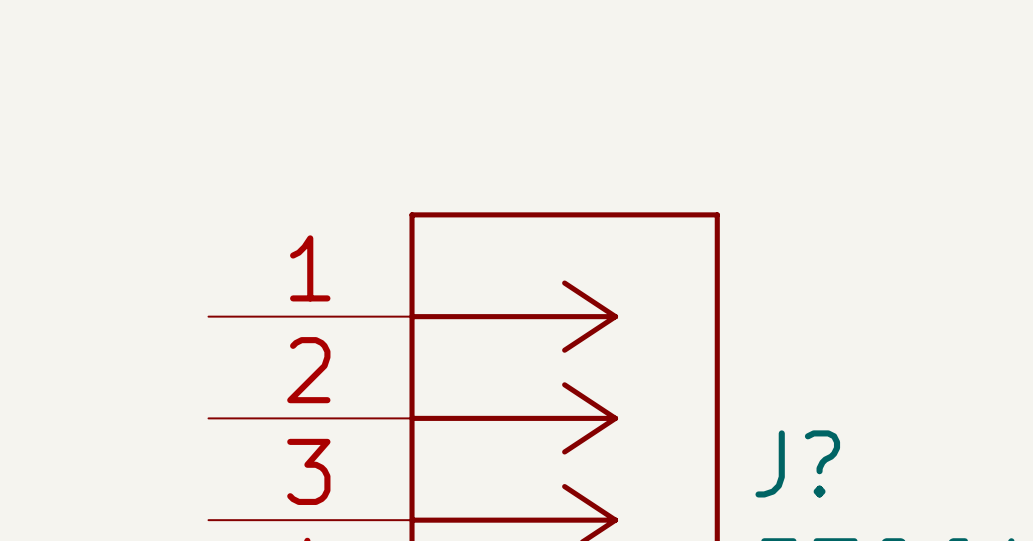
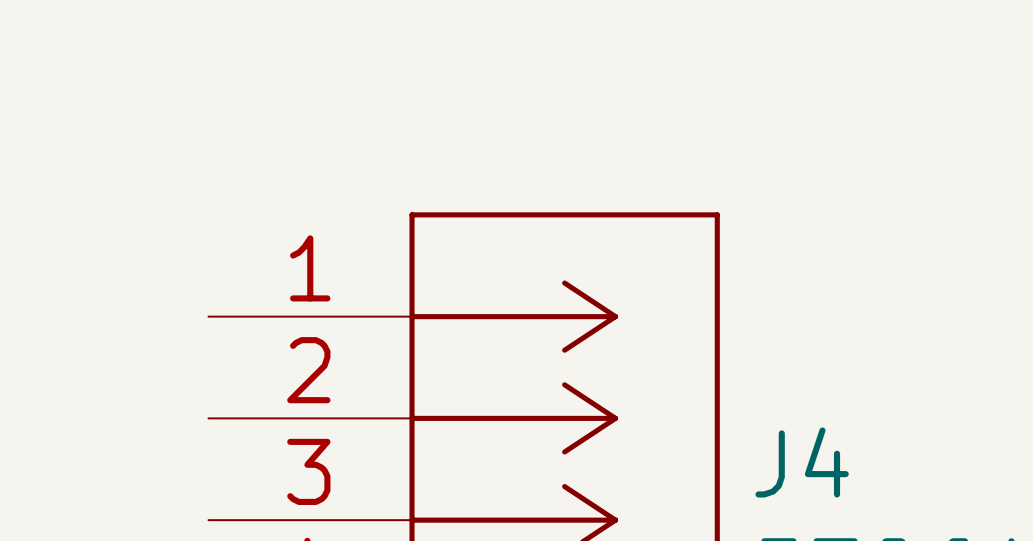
J? name: J? (797, 463) -> J4 (802, 462)

